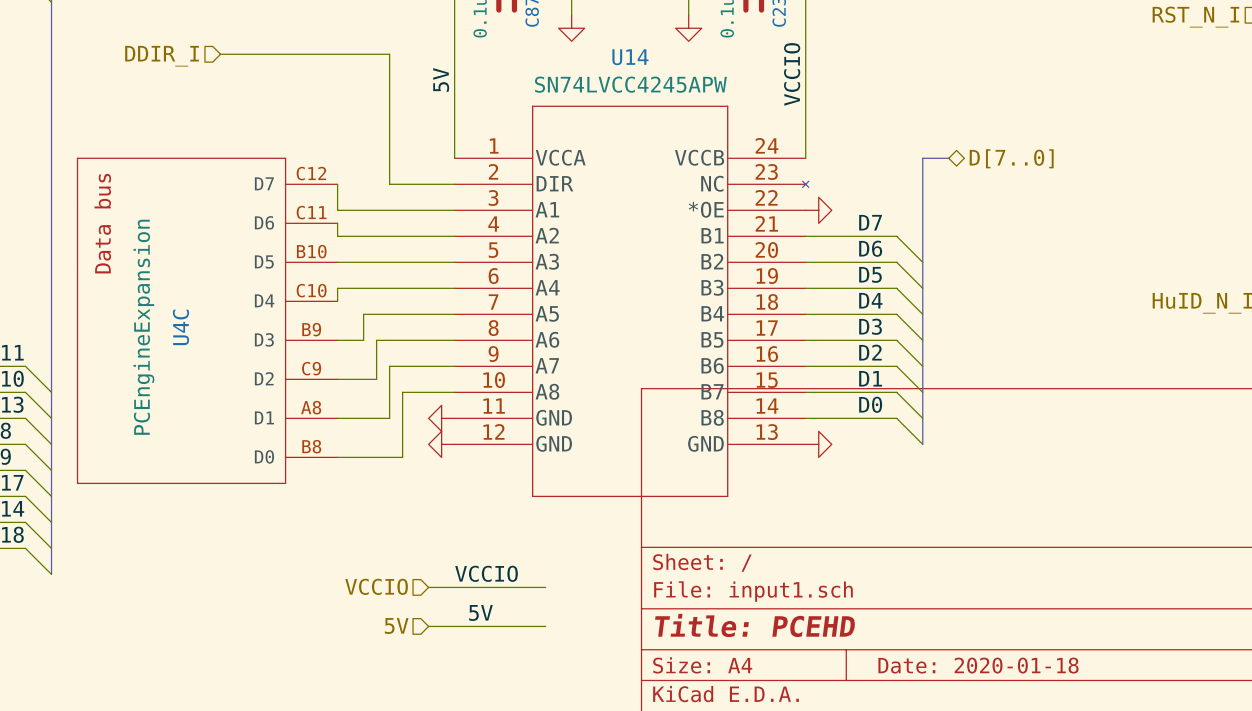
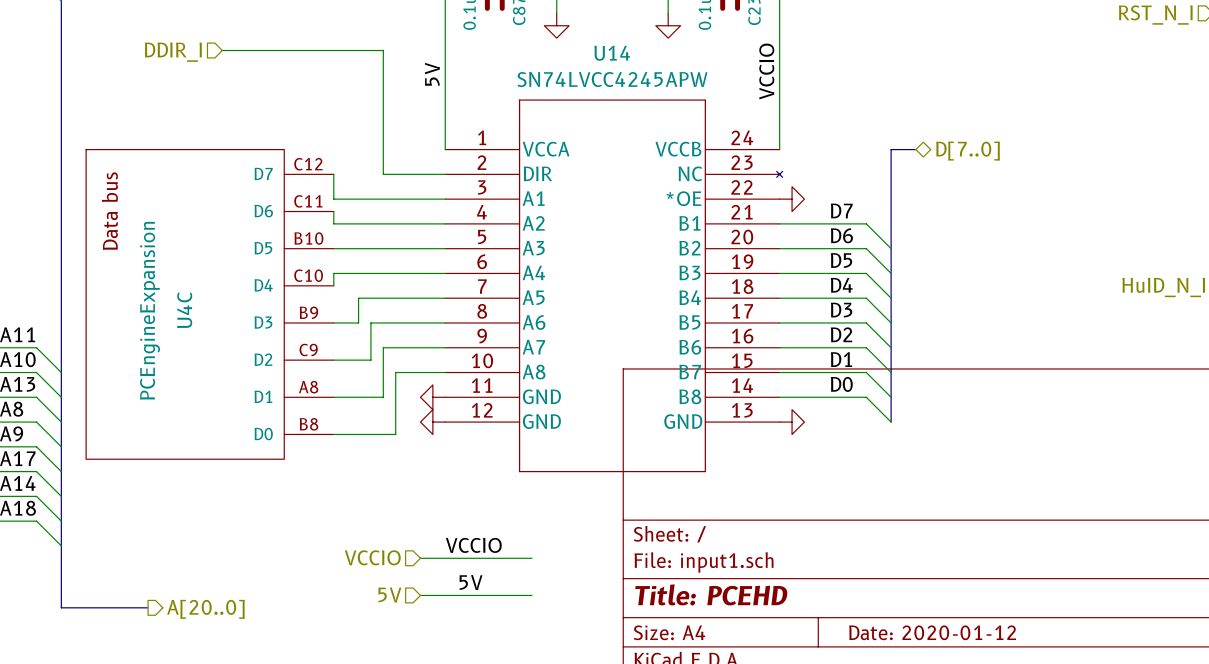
bus: none -> (61, 545) (61, 607) (148, 607)
hierarchical label: none -> A[20..0] (206, 609)
title block: Date: 2020-01-18 (978, 665) -> Date: 2020-01-12 (932, 632)

